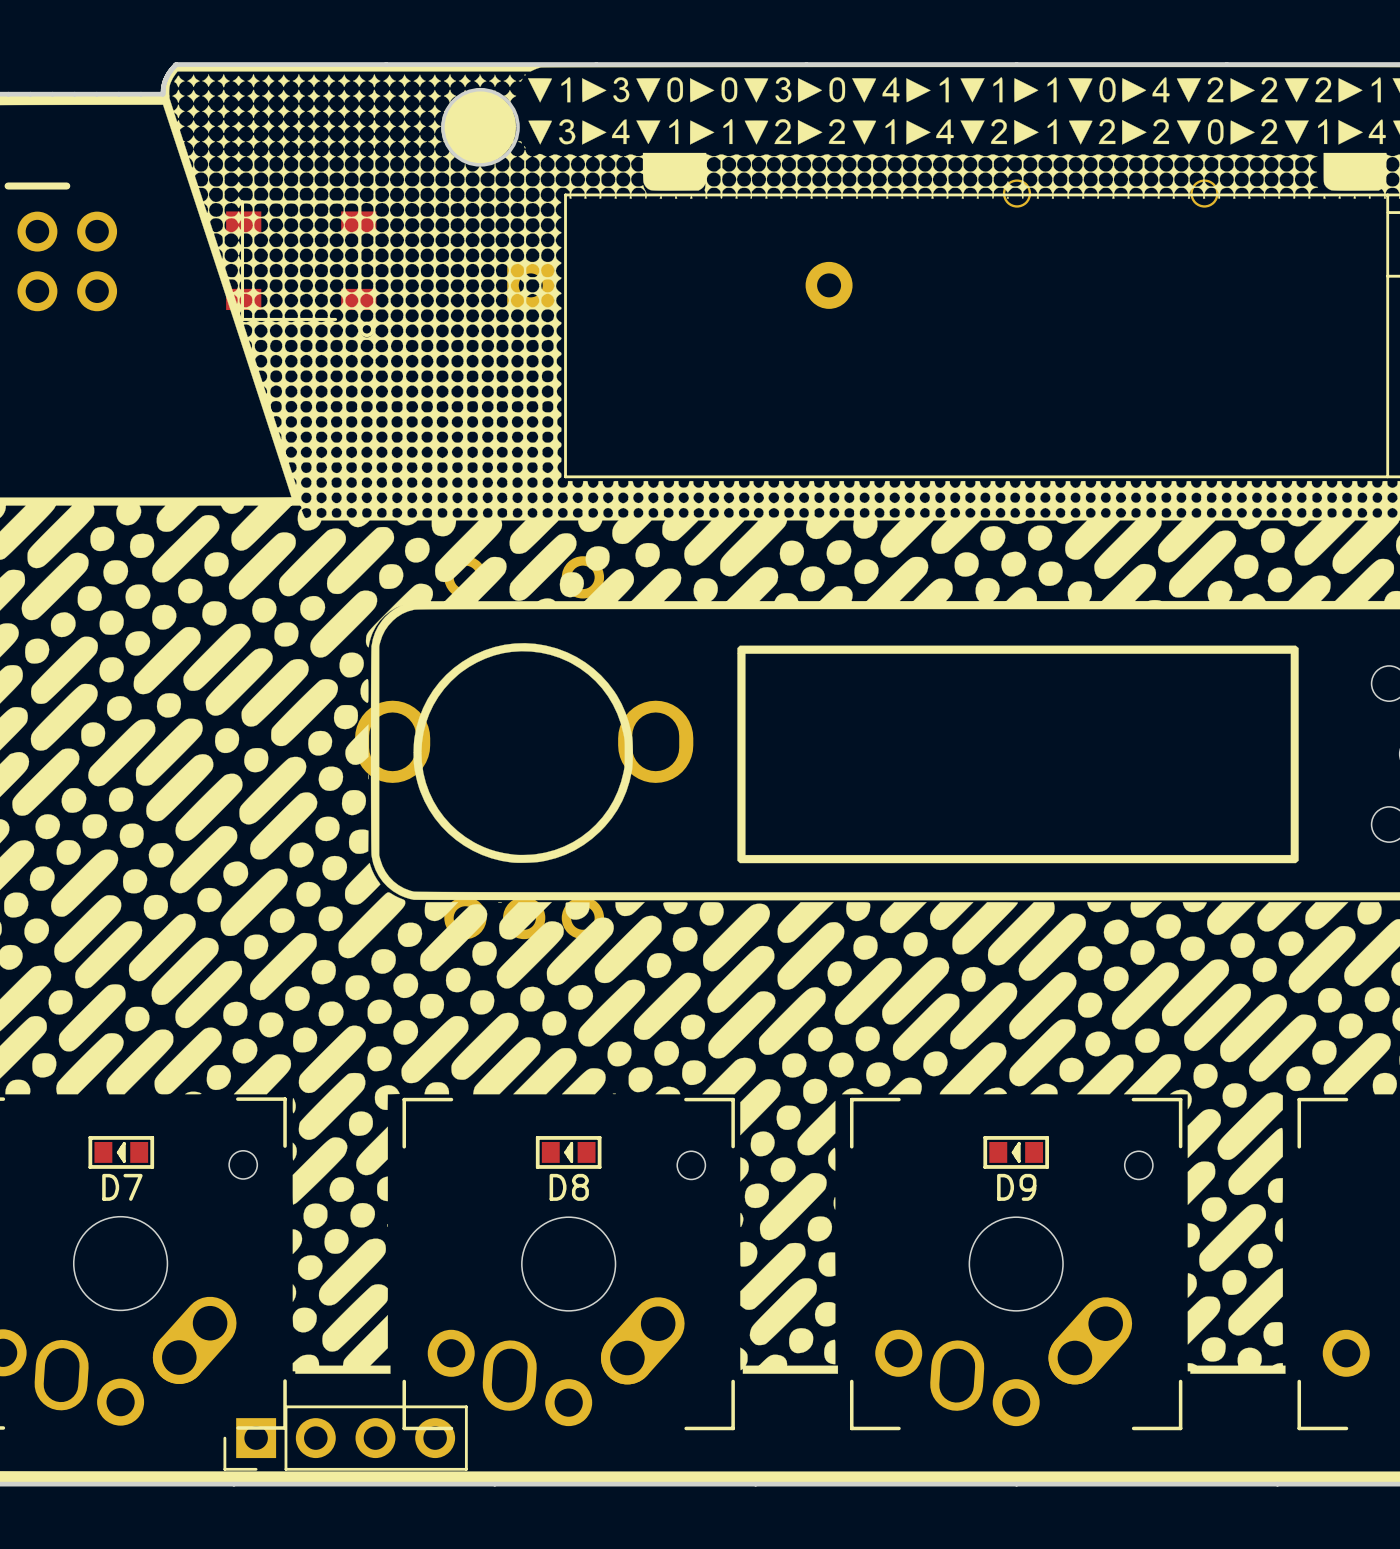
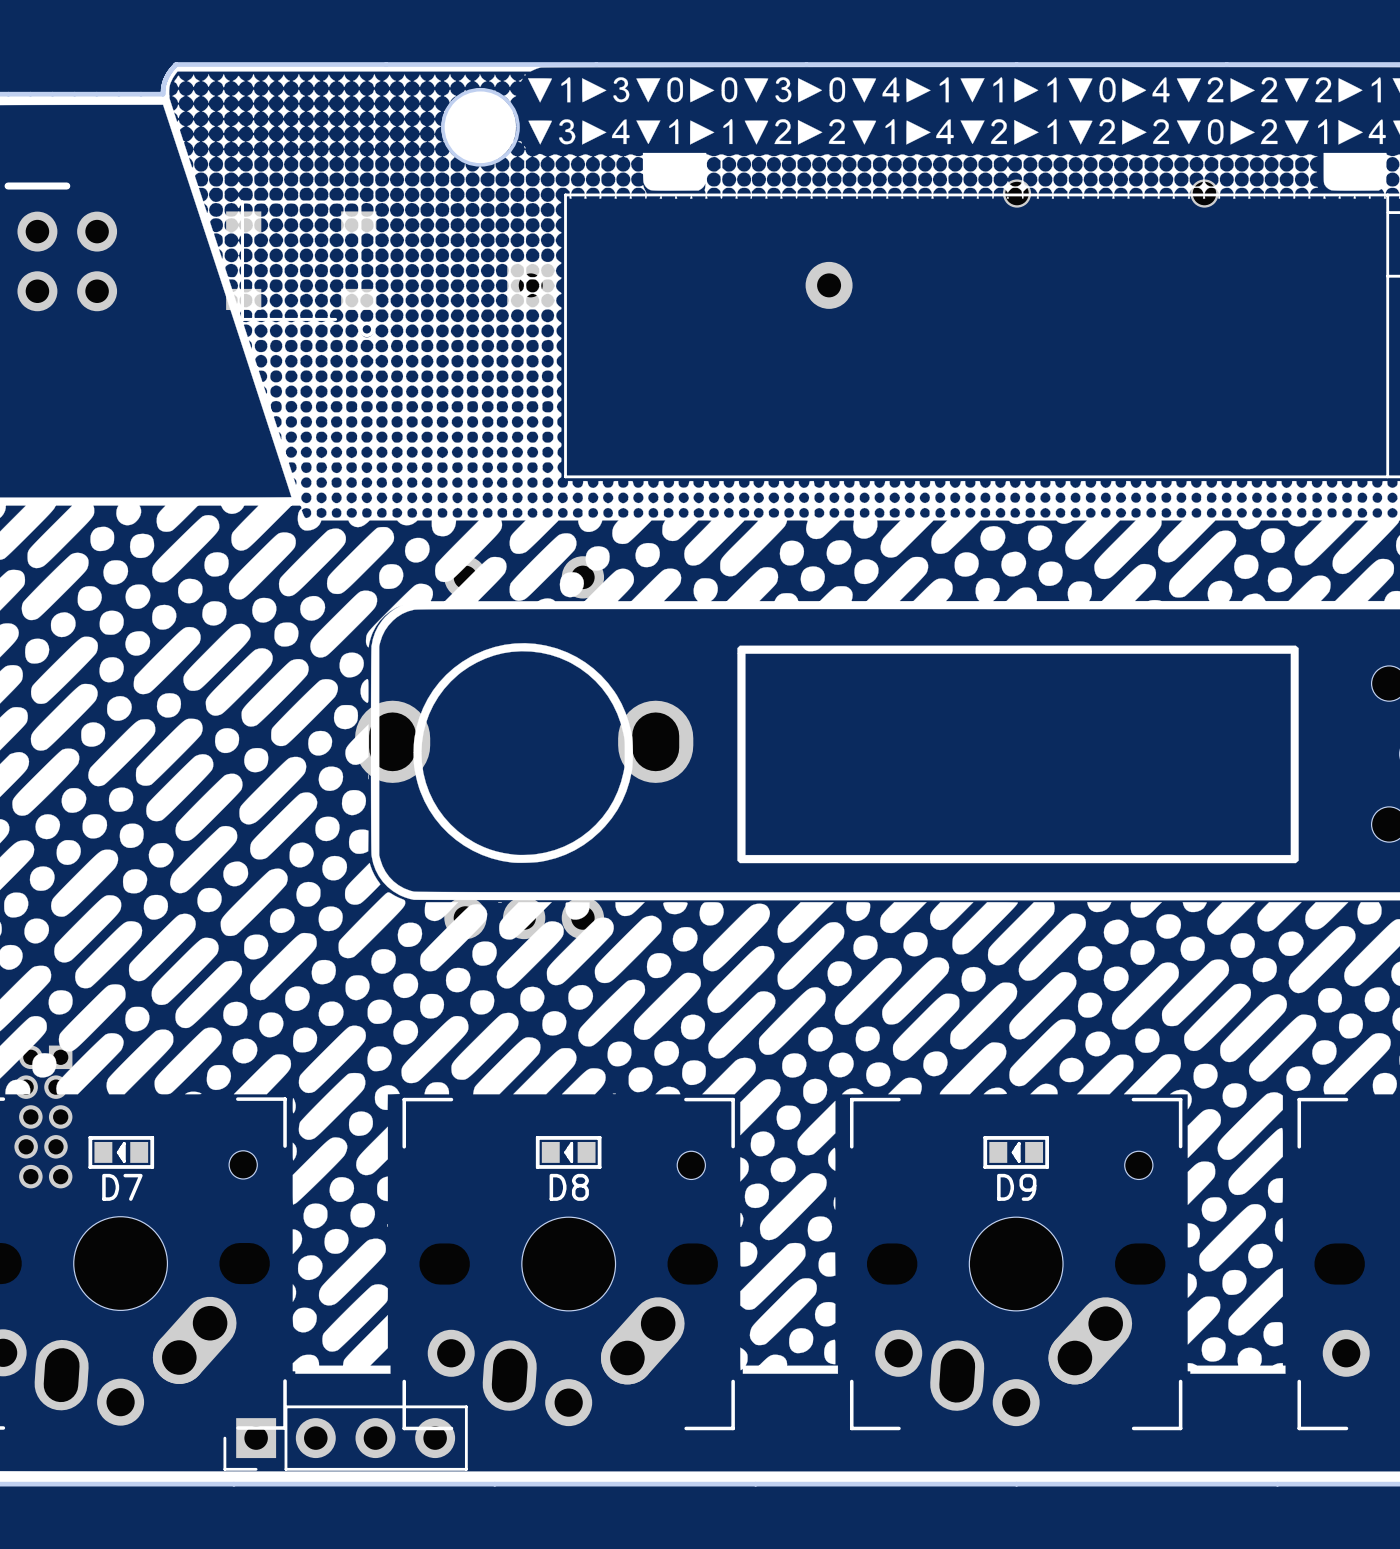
part: none -> (43, 1116)

